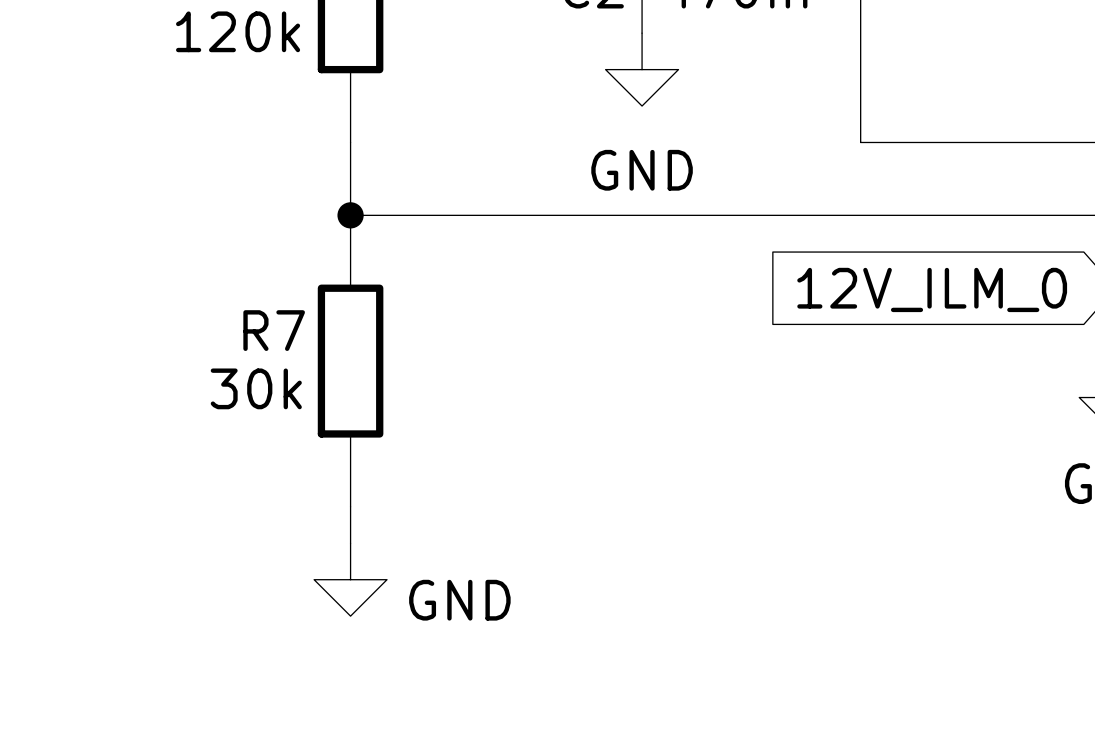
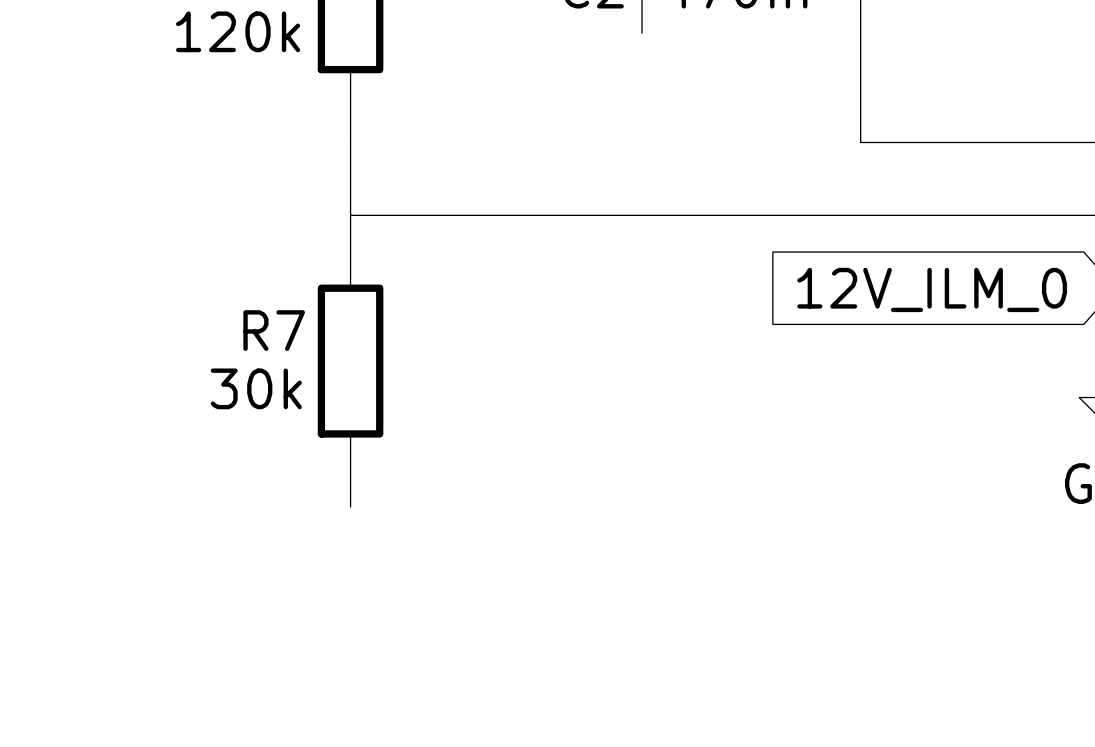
power symbol: GND (642, 69) -> none
junction: (350, 215) -> none
wire: (350, 506) (350, 543) -> none
power symbol: GND (350, 579) -> none

